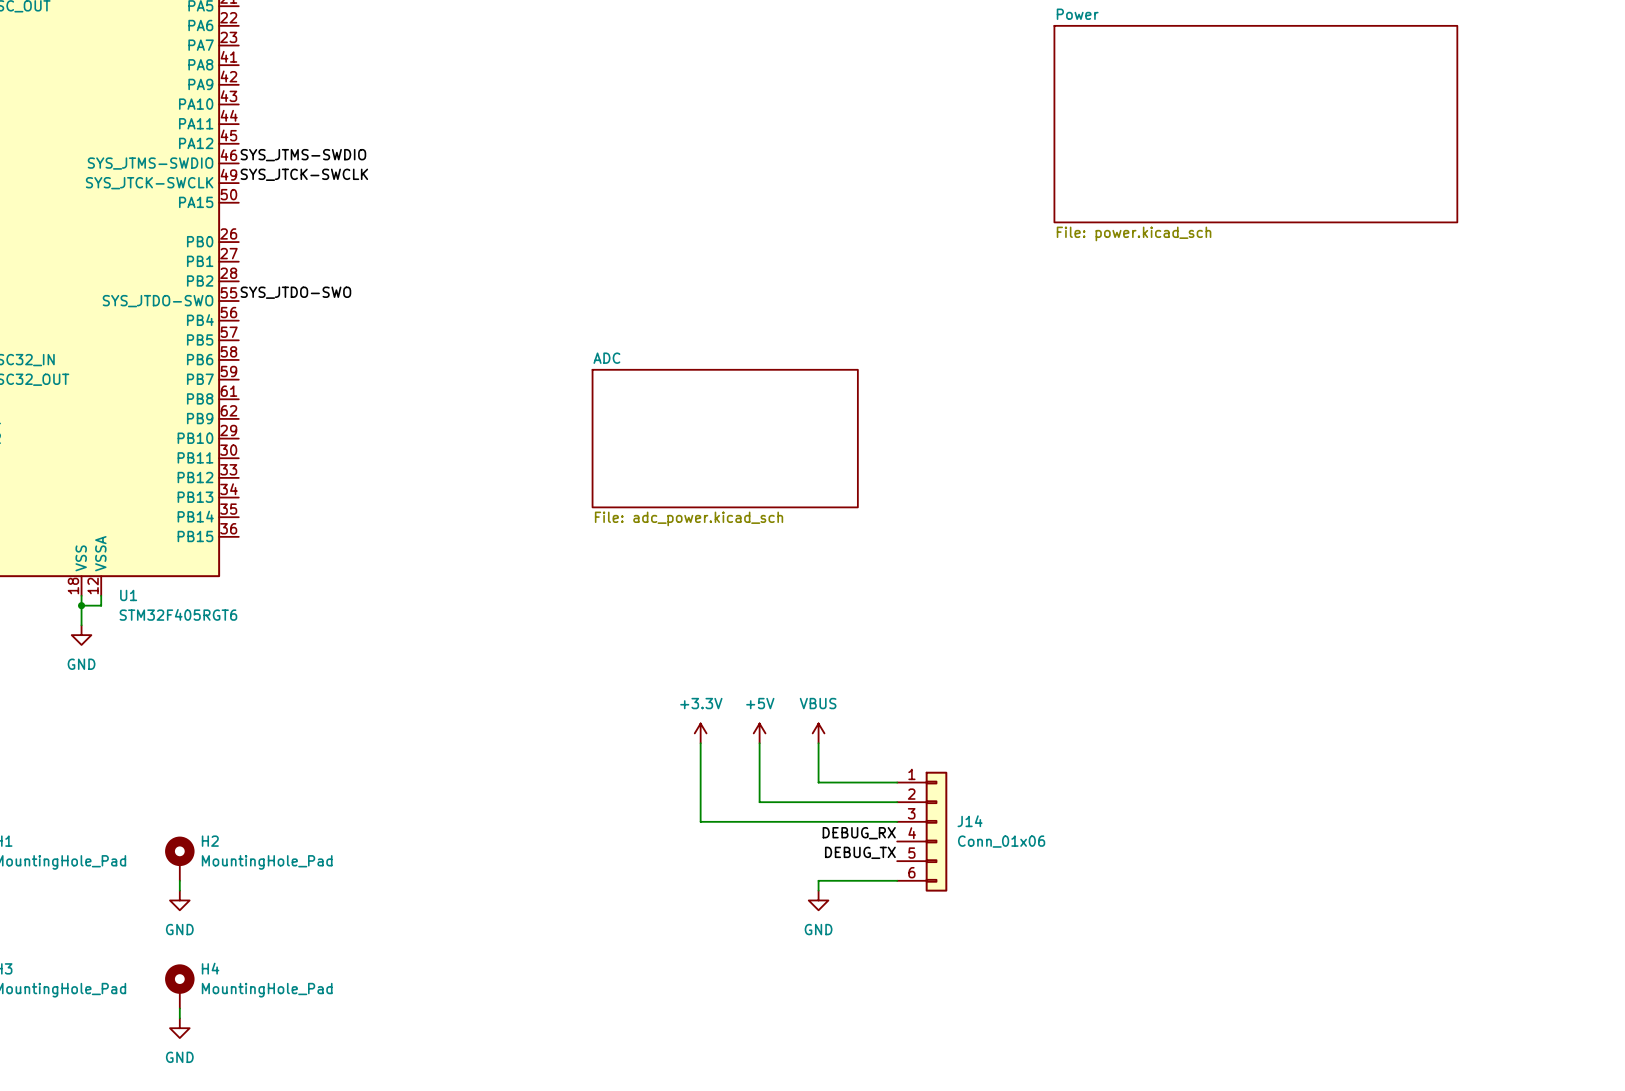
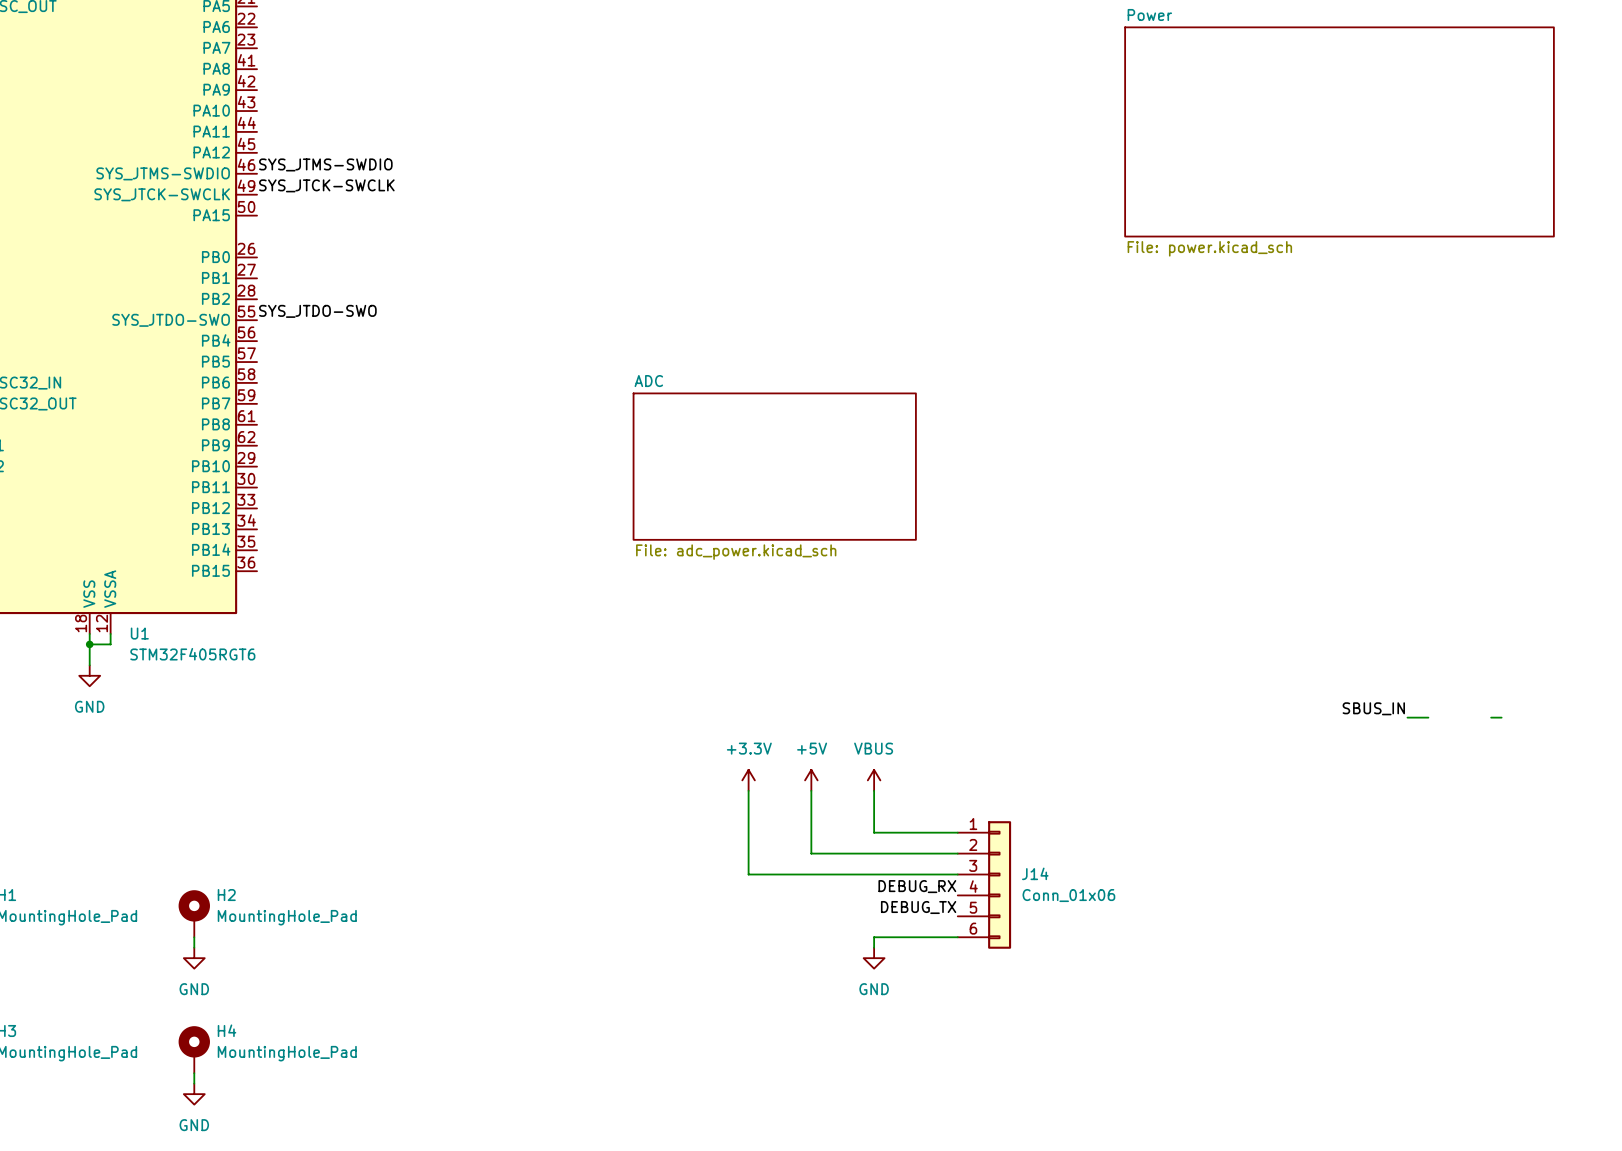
label: none -> SBUS_IN (1373, 708)
wire: none -> (1407, 717) (1428, 717)
wire: none -> (1491, 717) (1501, 717)

